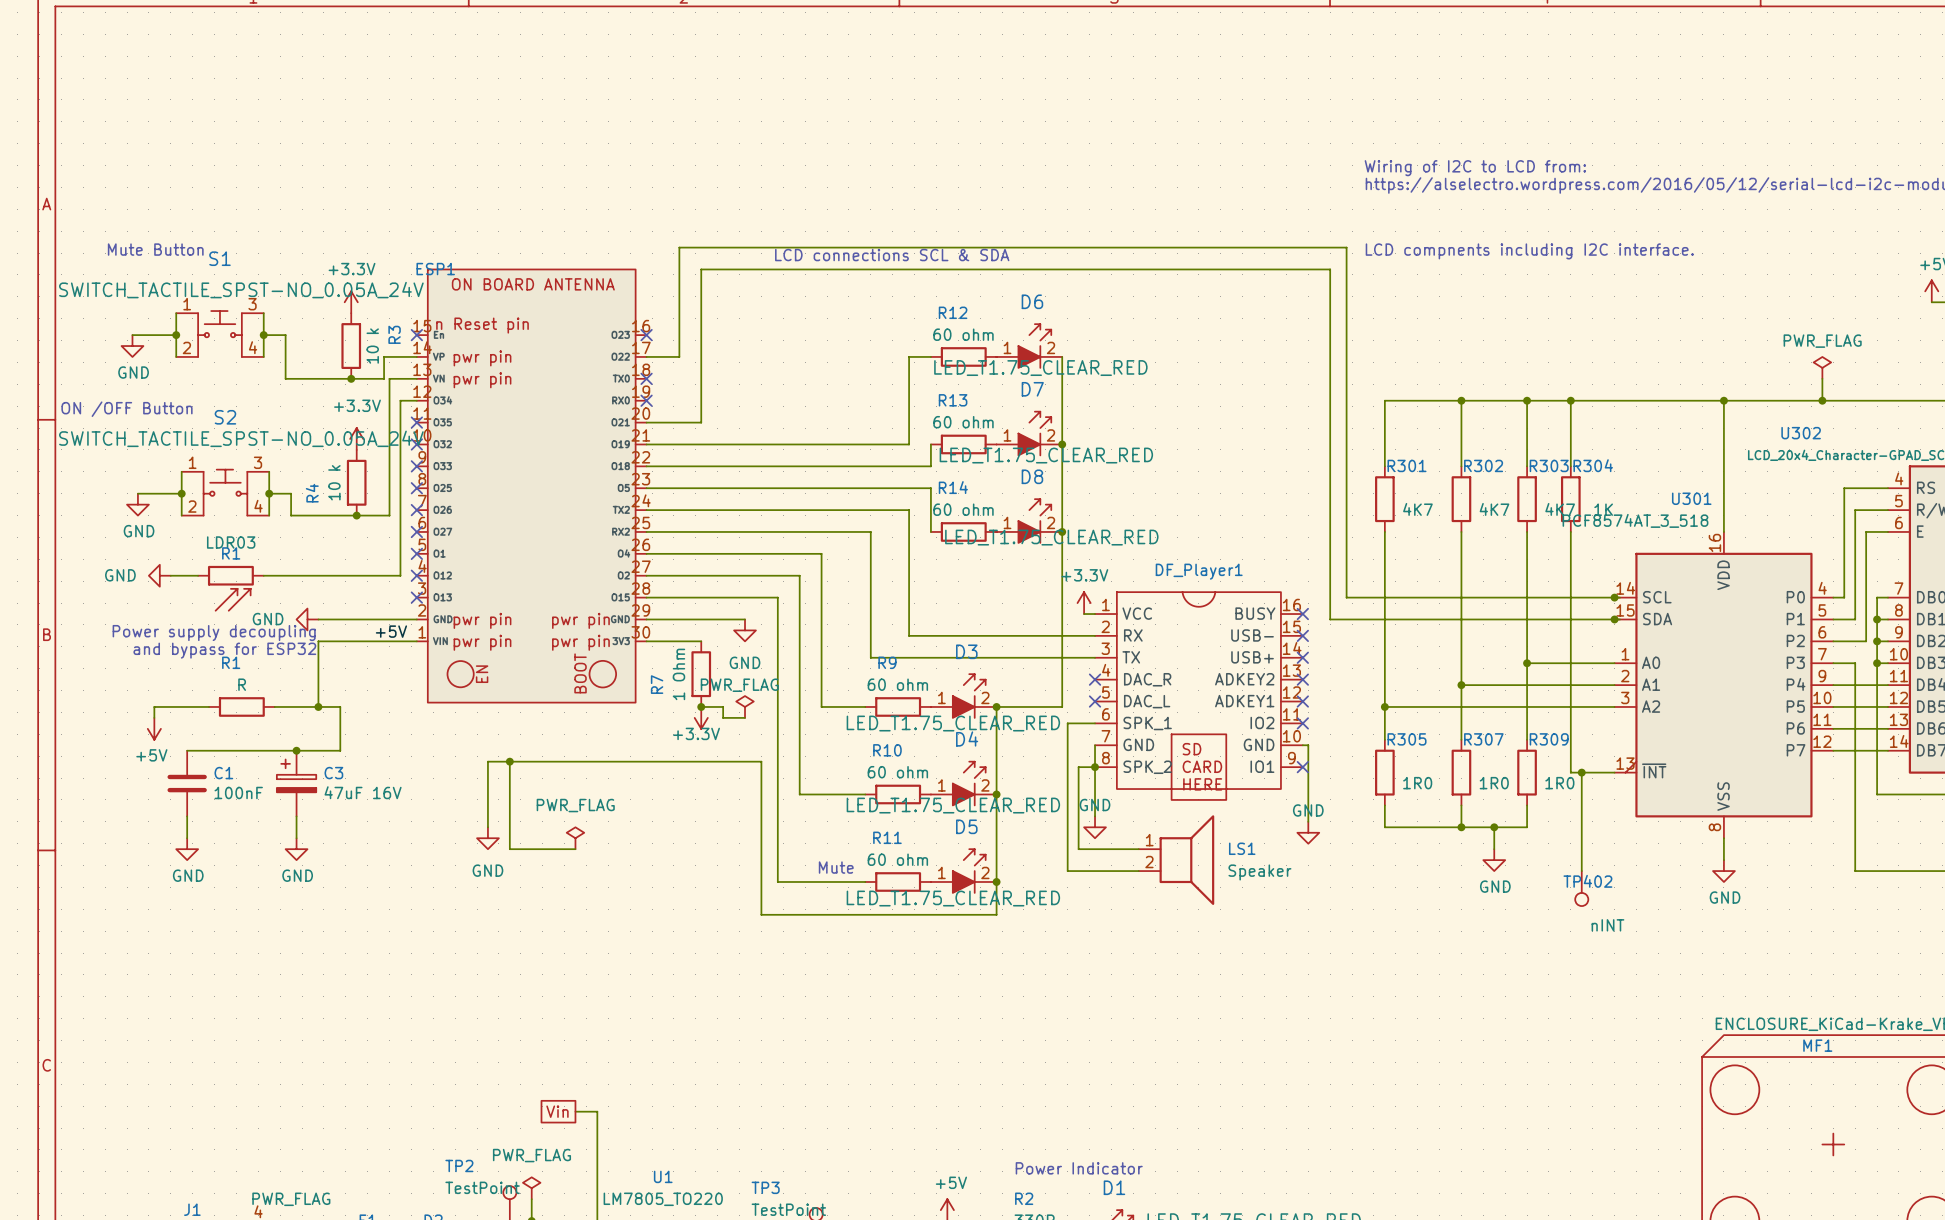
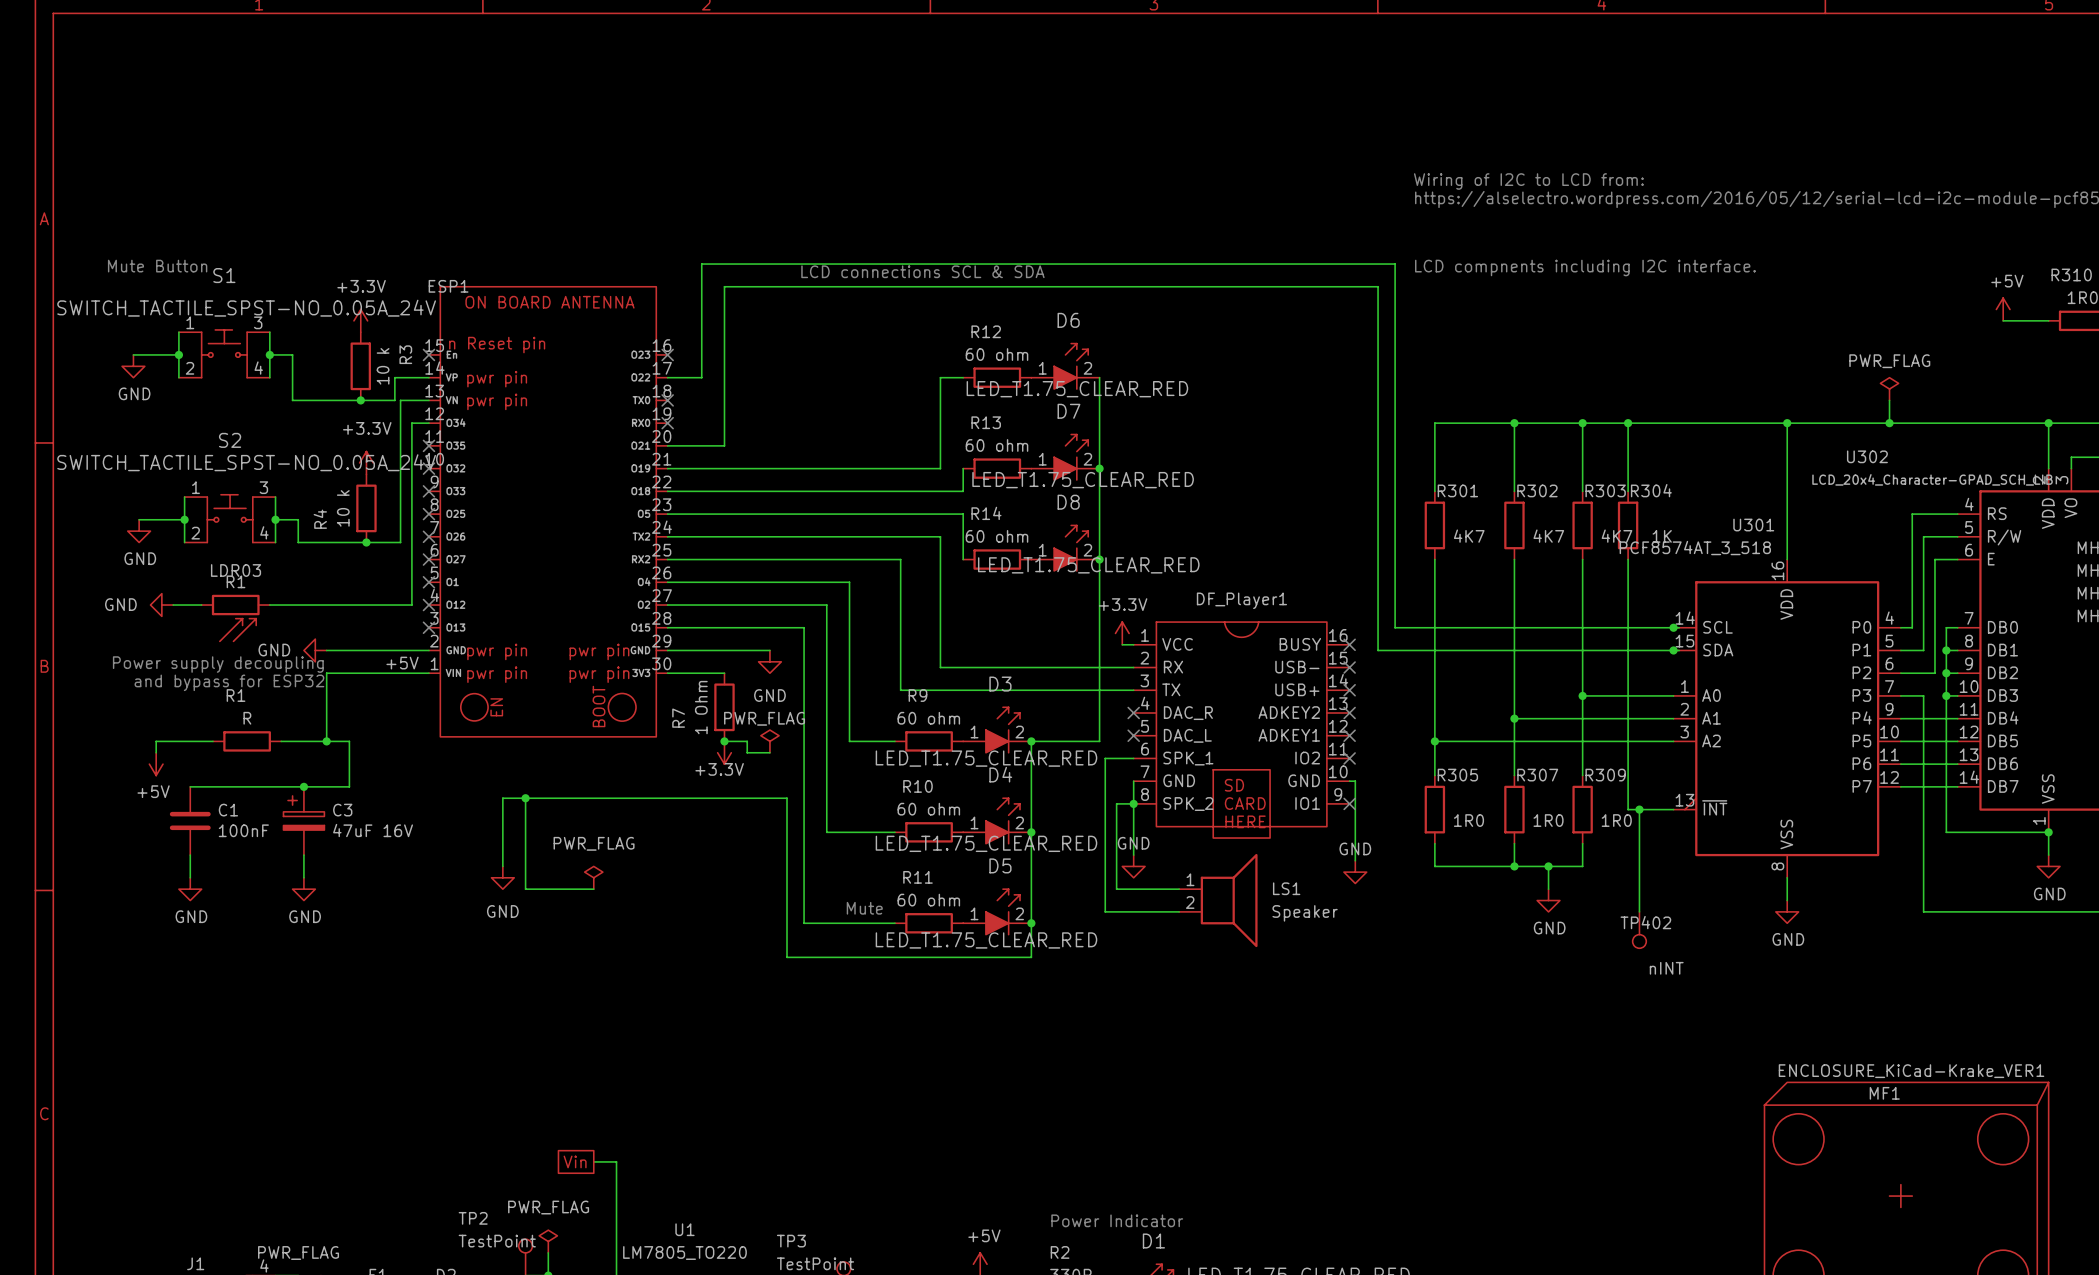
text: ON /OFF Button (126, 409) -> none

